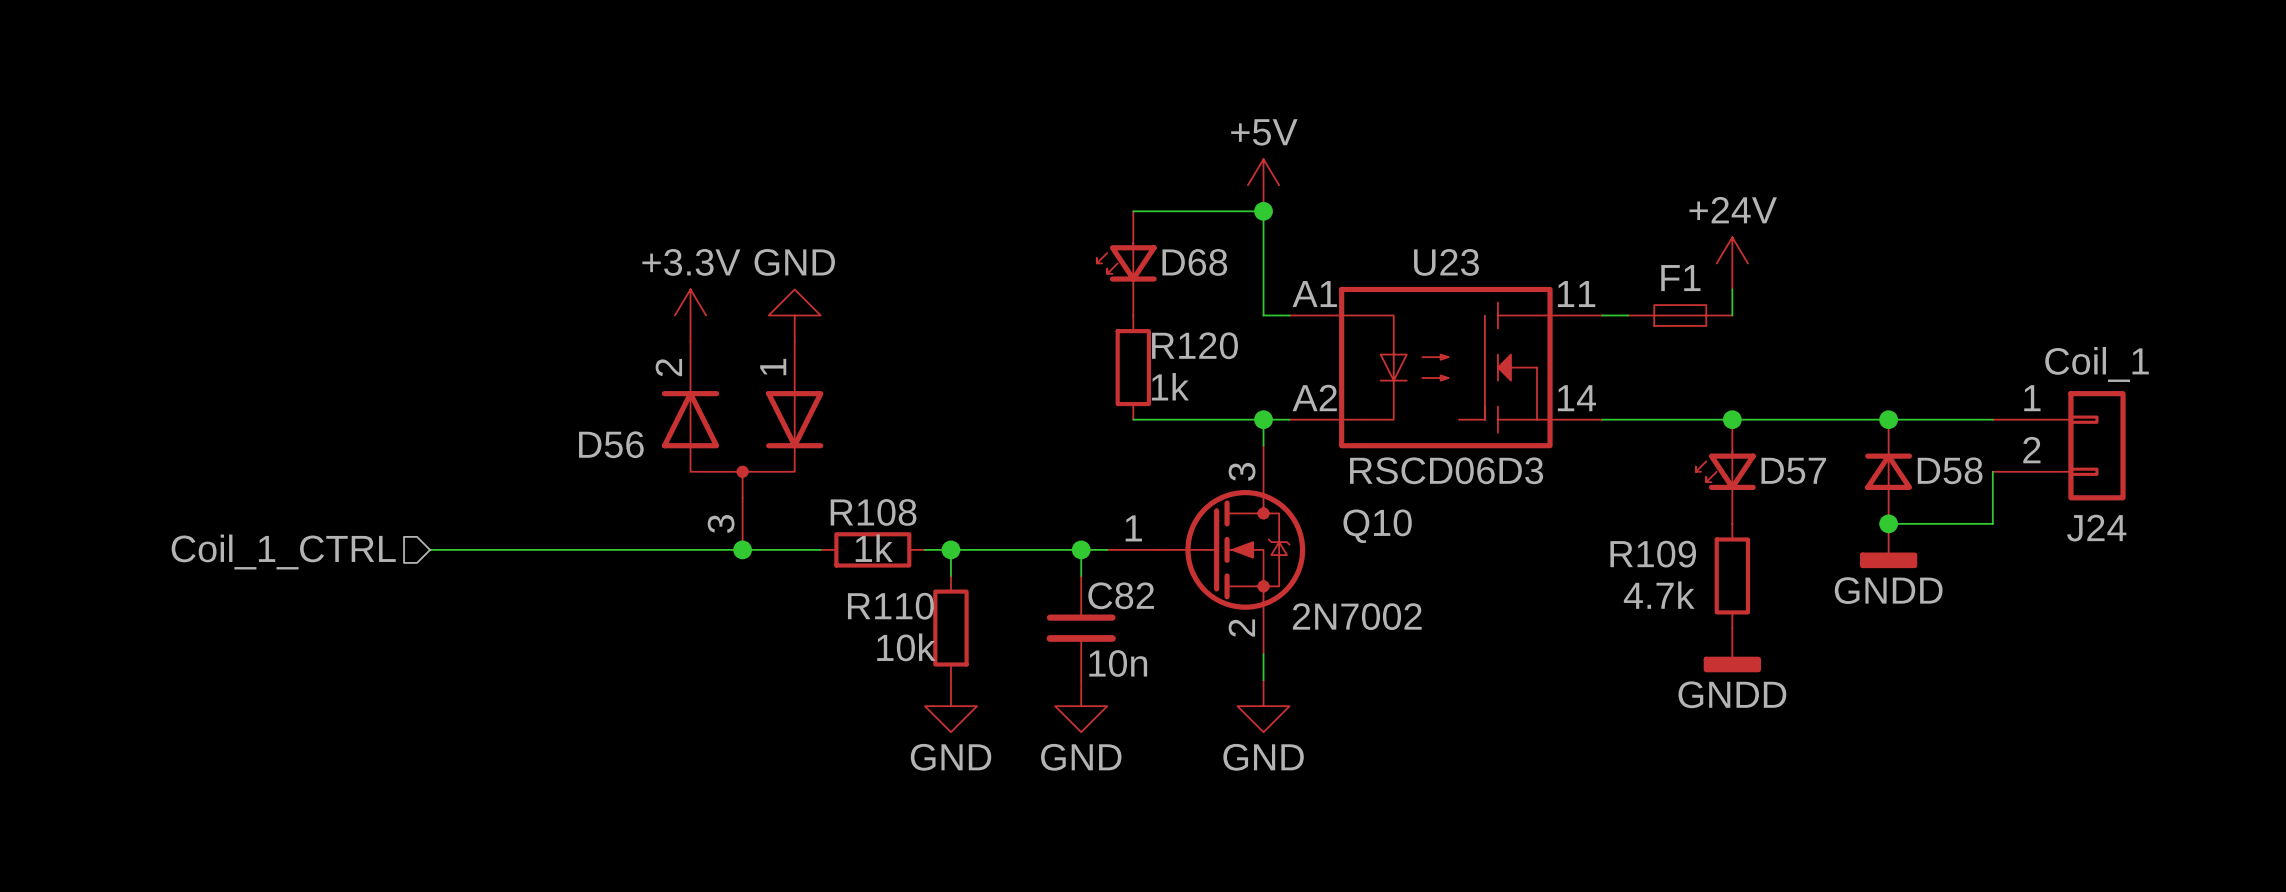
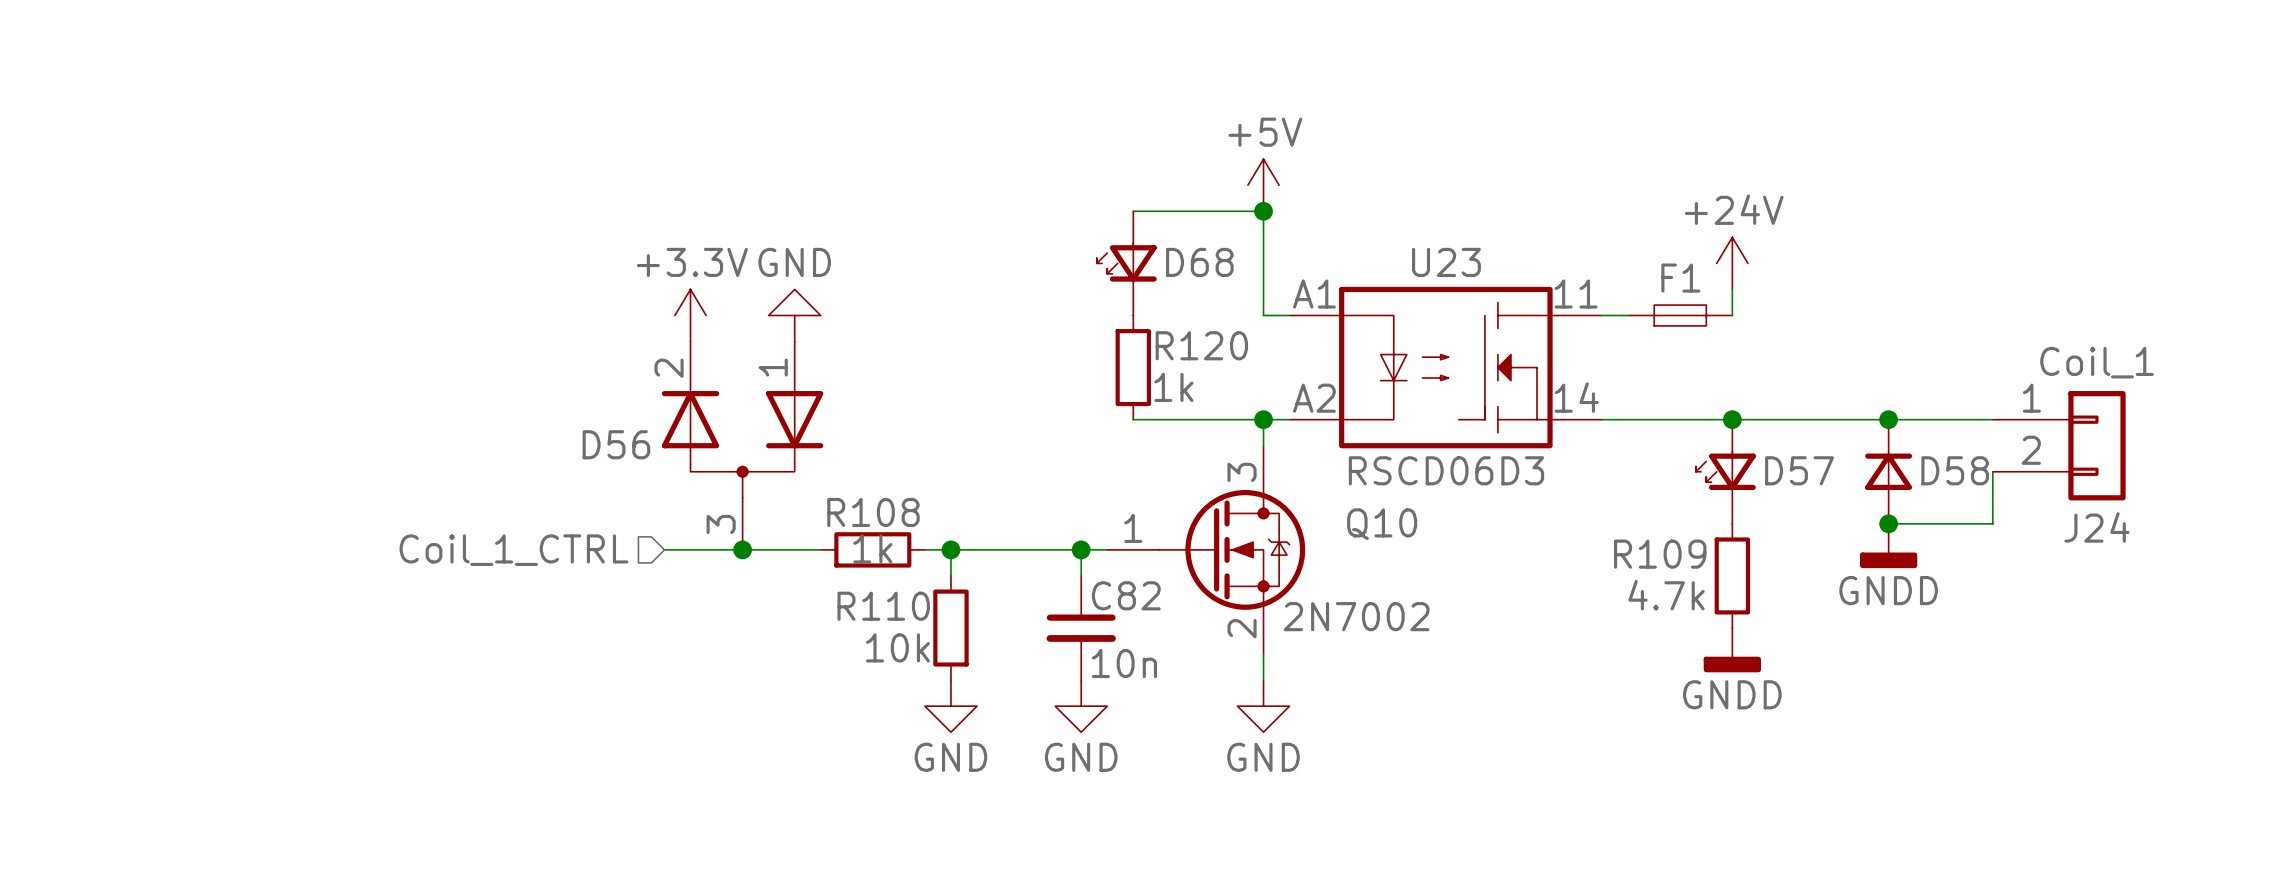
wire: (430, 549) (664, 549) -> none
hierarchical label position: Coil_1_CTRL (283, 552) -> Coil_1_CTRL (514, 550)

